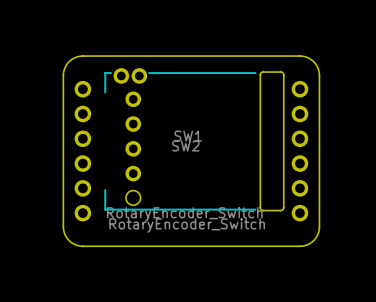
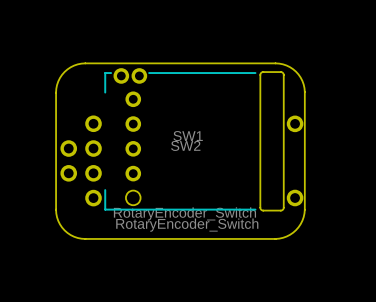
SW2 footprint: [62, 55, 321, 247] -> [55, 62, 306, 240]

